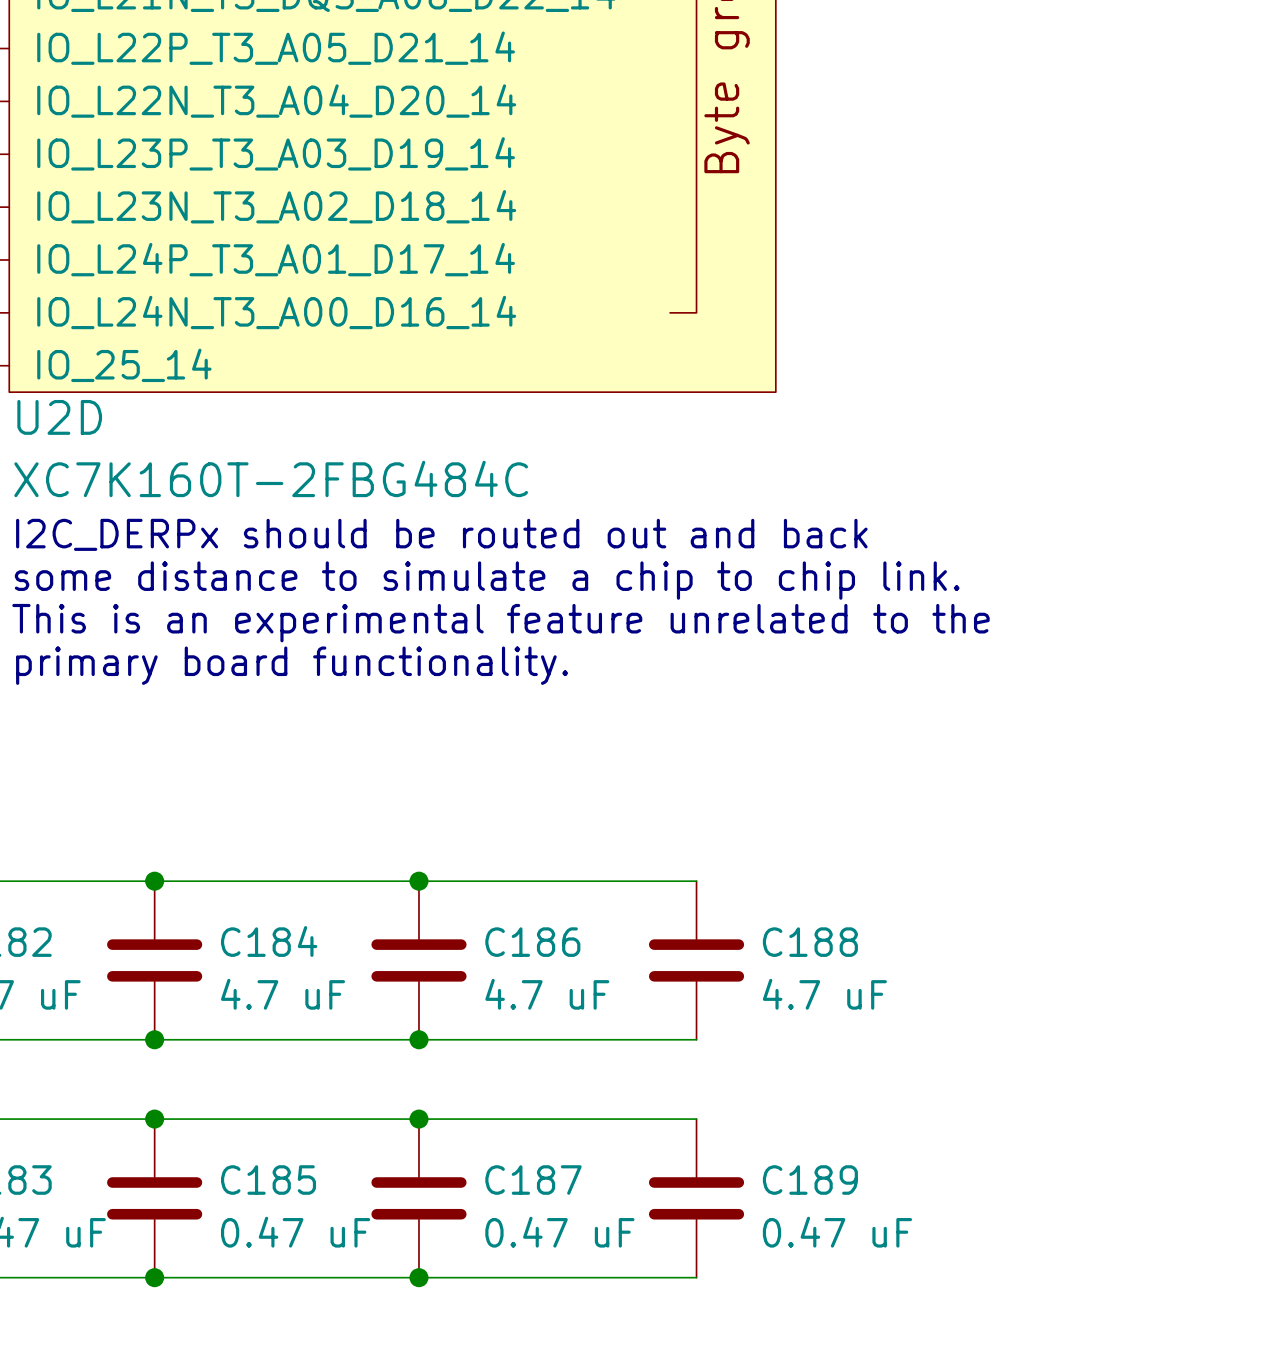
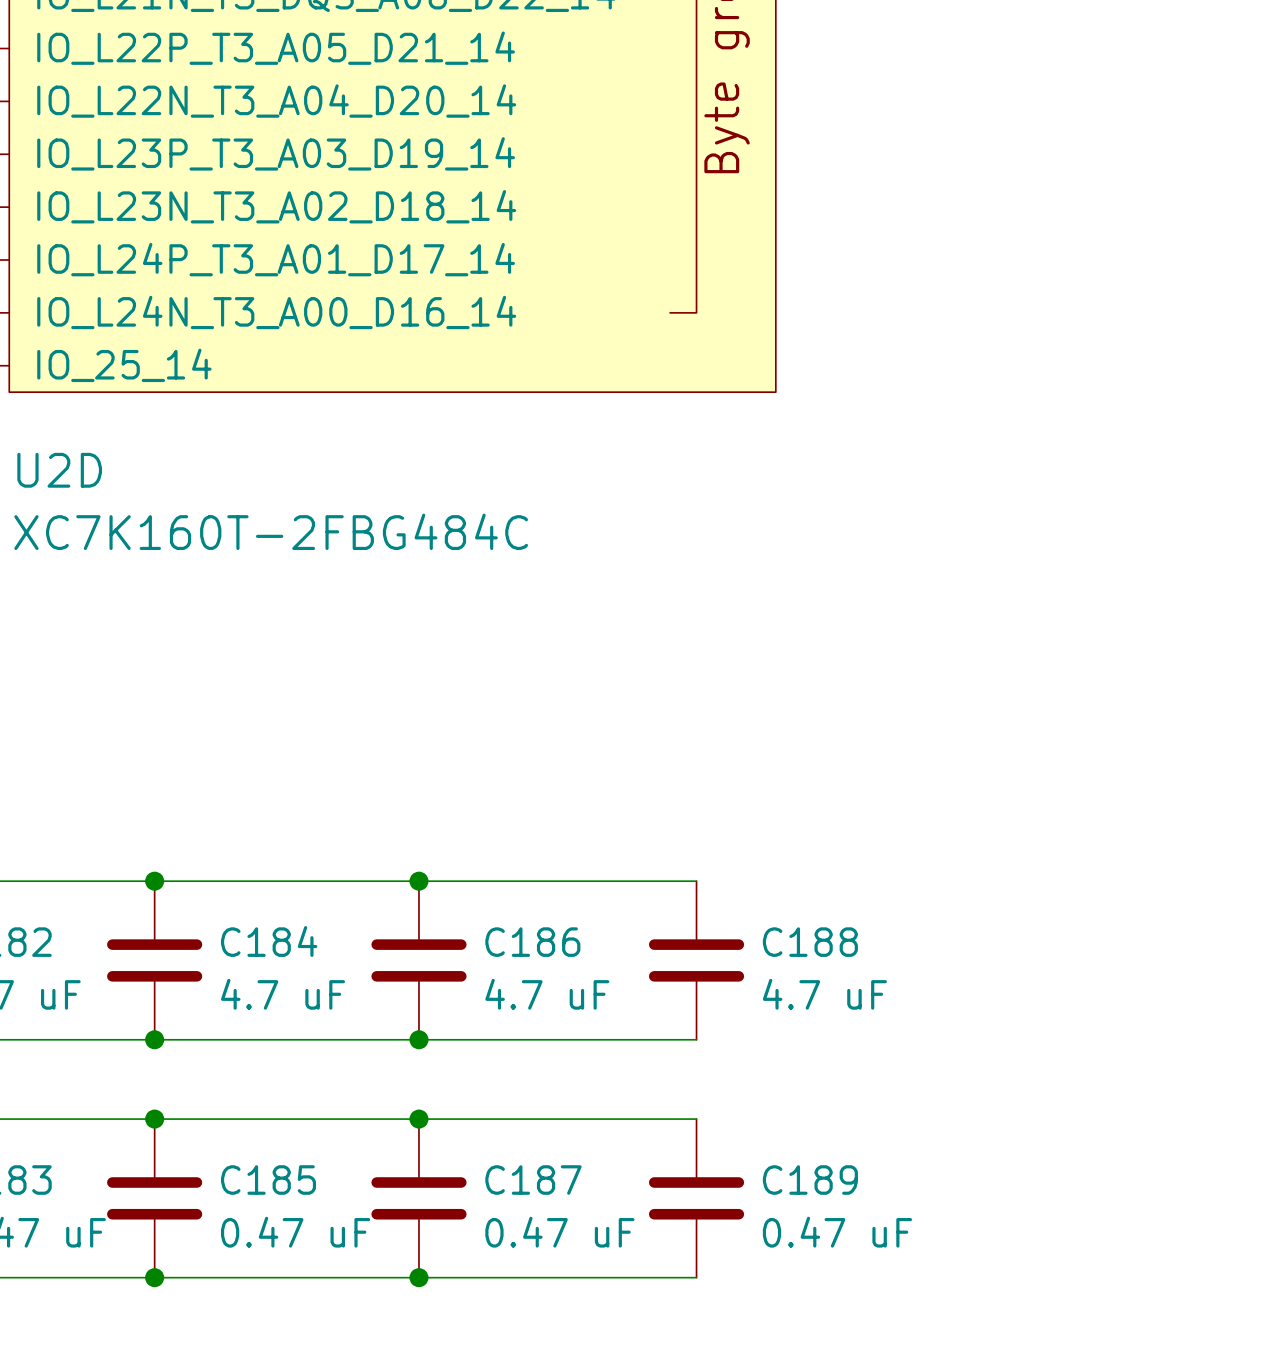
U2D name position: U2D (59, 417) -> U2D (59, 470)
U2D value position: XC7K160T-2FBG484C (271, 478) -> XC7K160T-2FBG484C (271, 531)
text: I2C_DERPx should be routed out and back (441, 534) -> none
text: some distance to simulate a chip to chip link. (487, 580) -> none
text: This is an experimental feature unrelated to the (501, 623) -> none
text: primary board functionality. (292, 665) -> none

